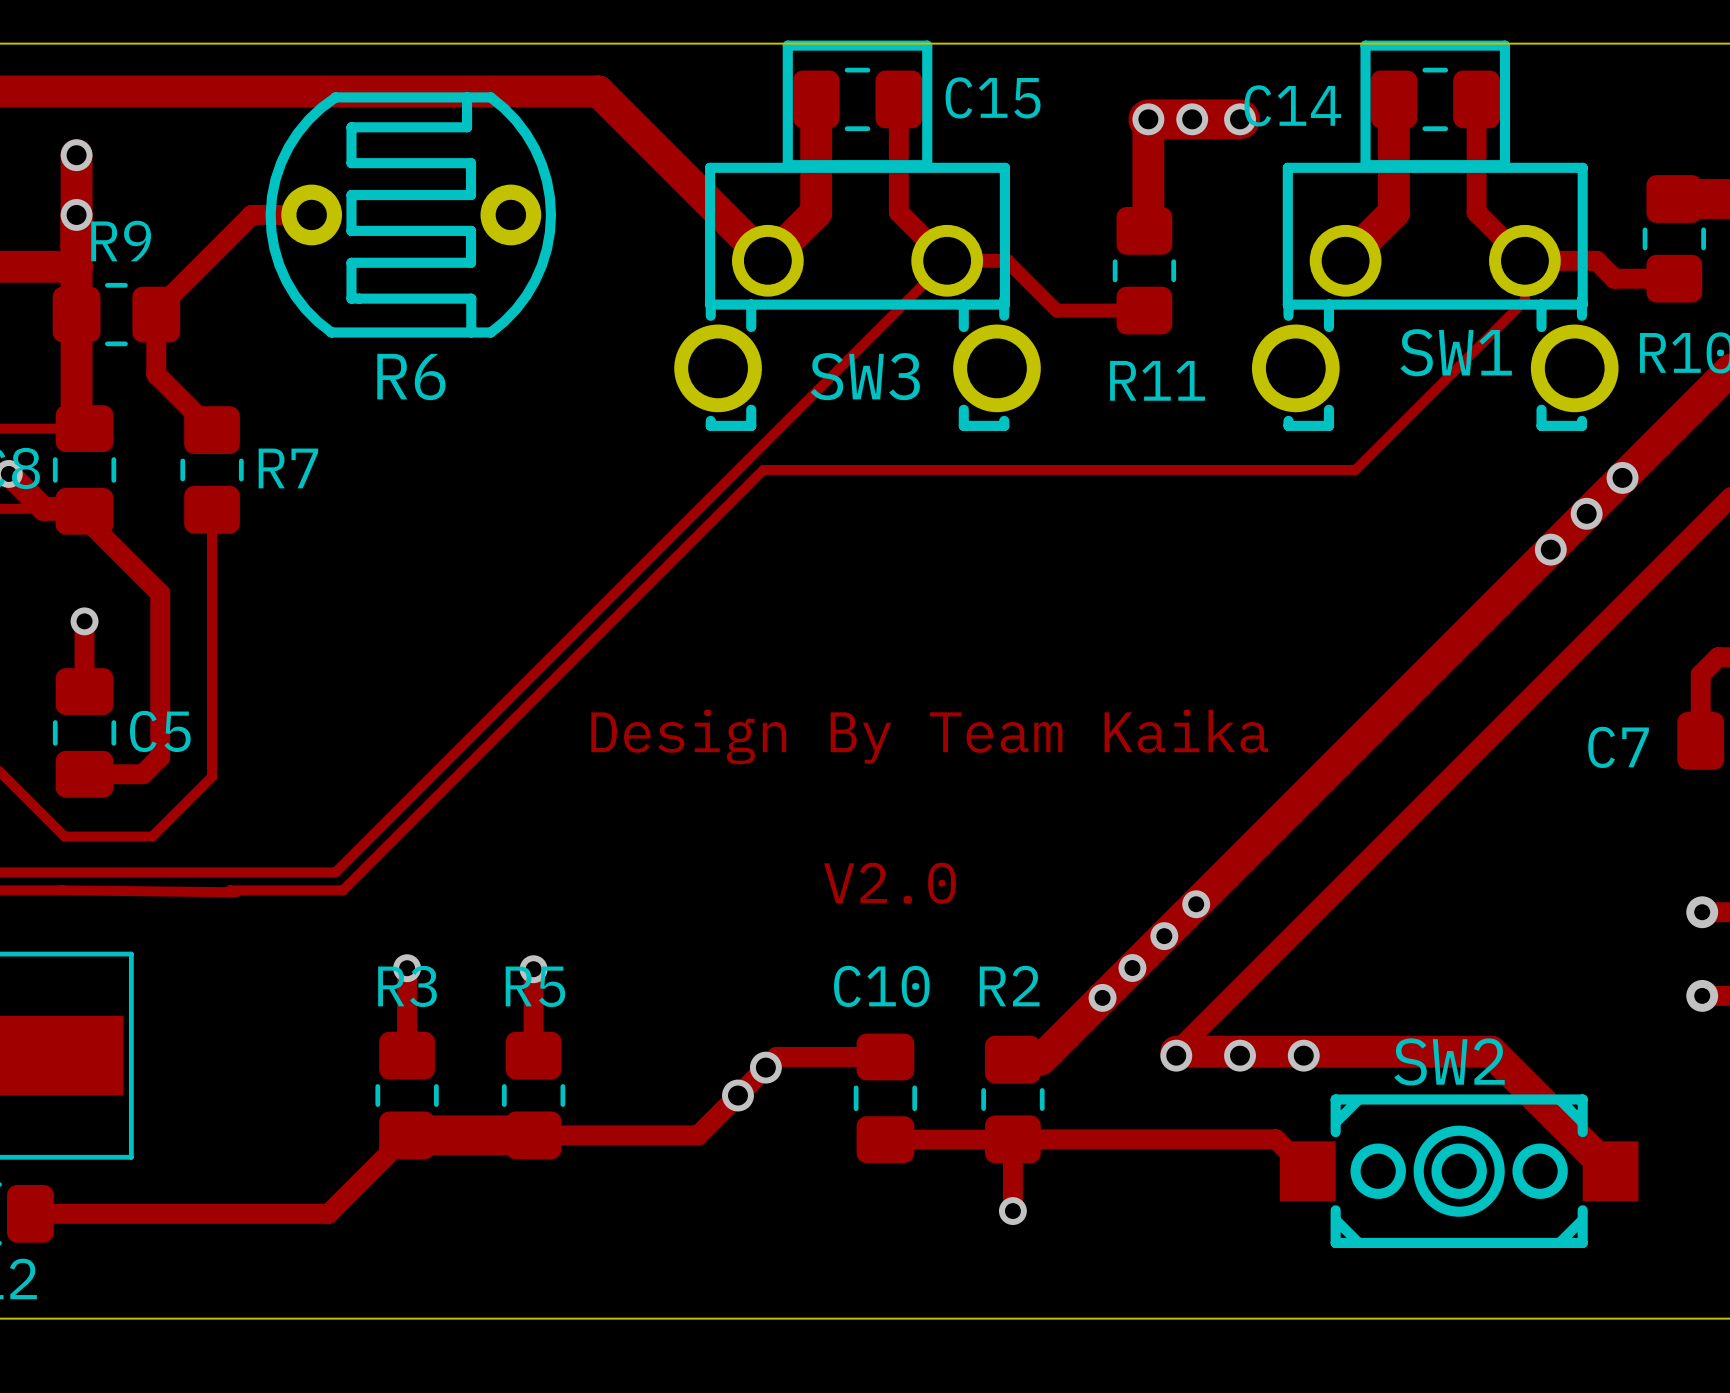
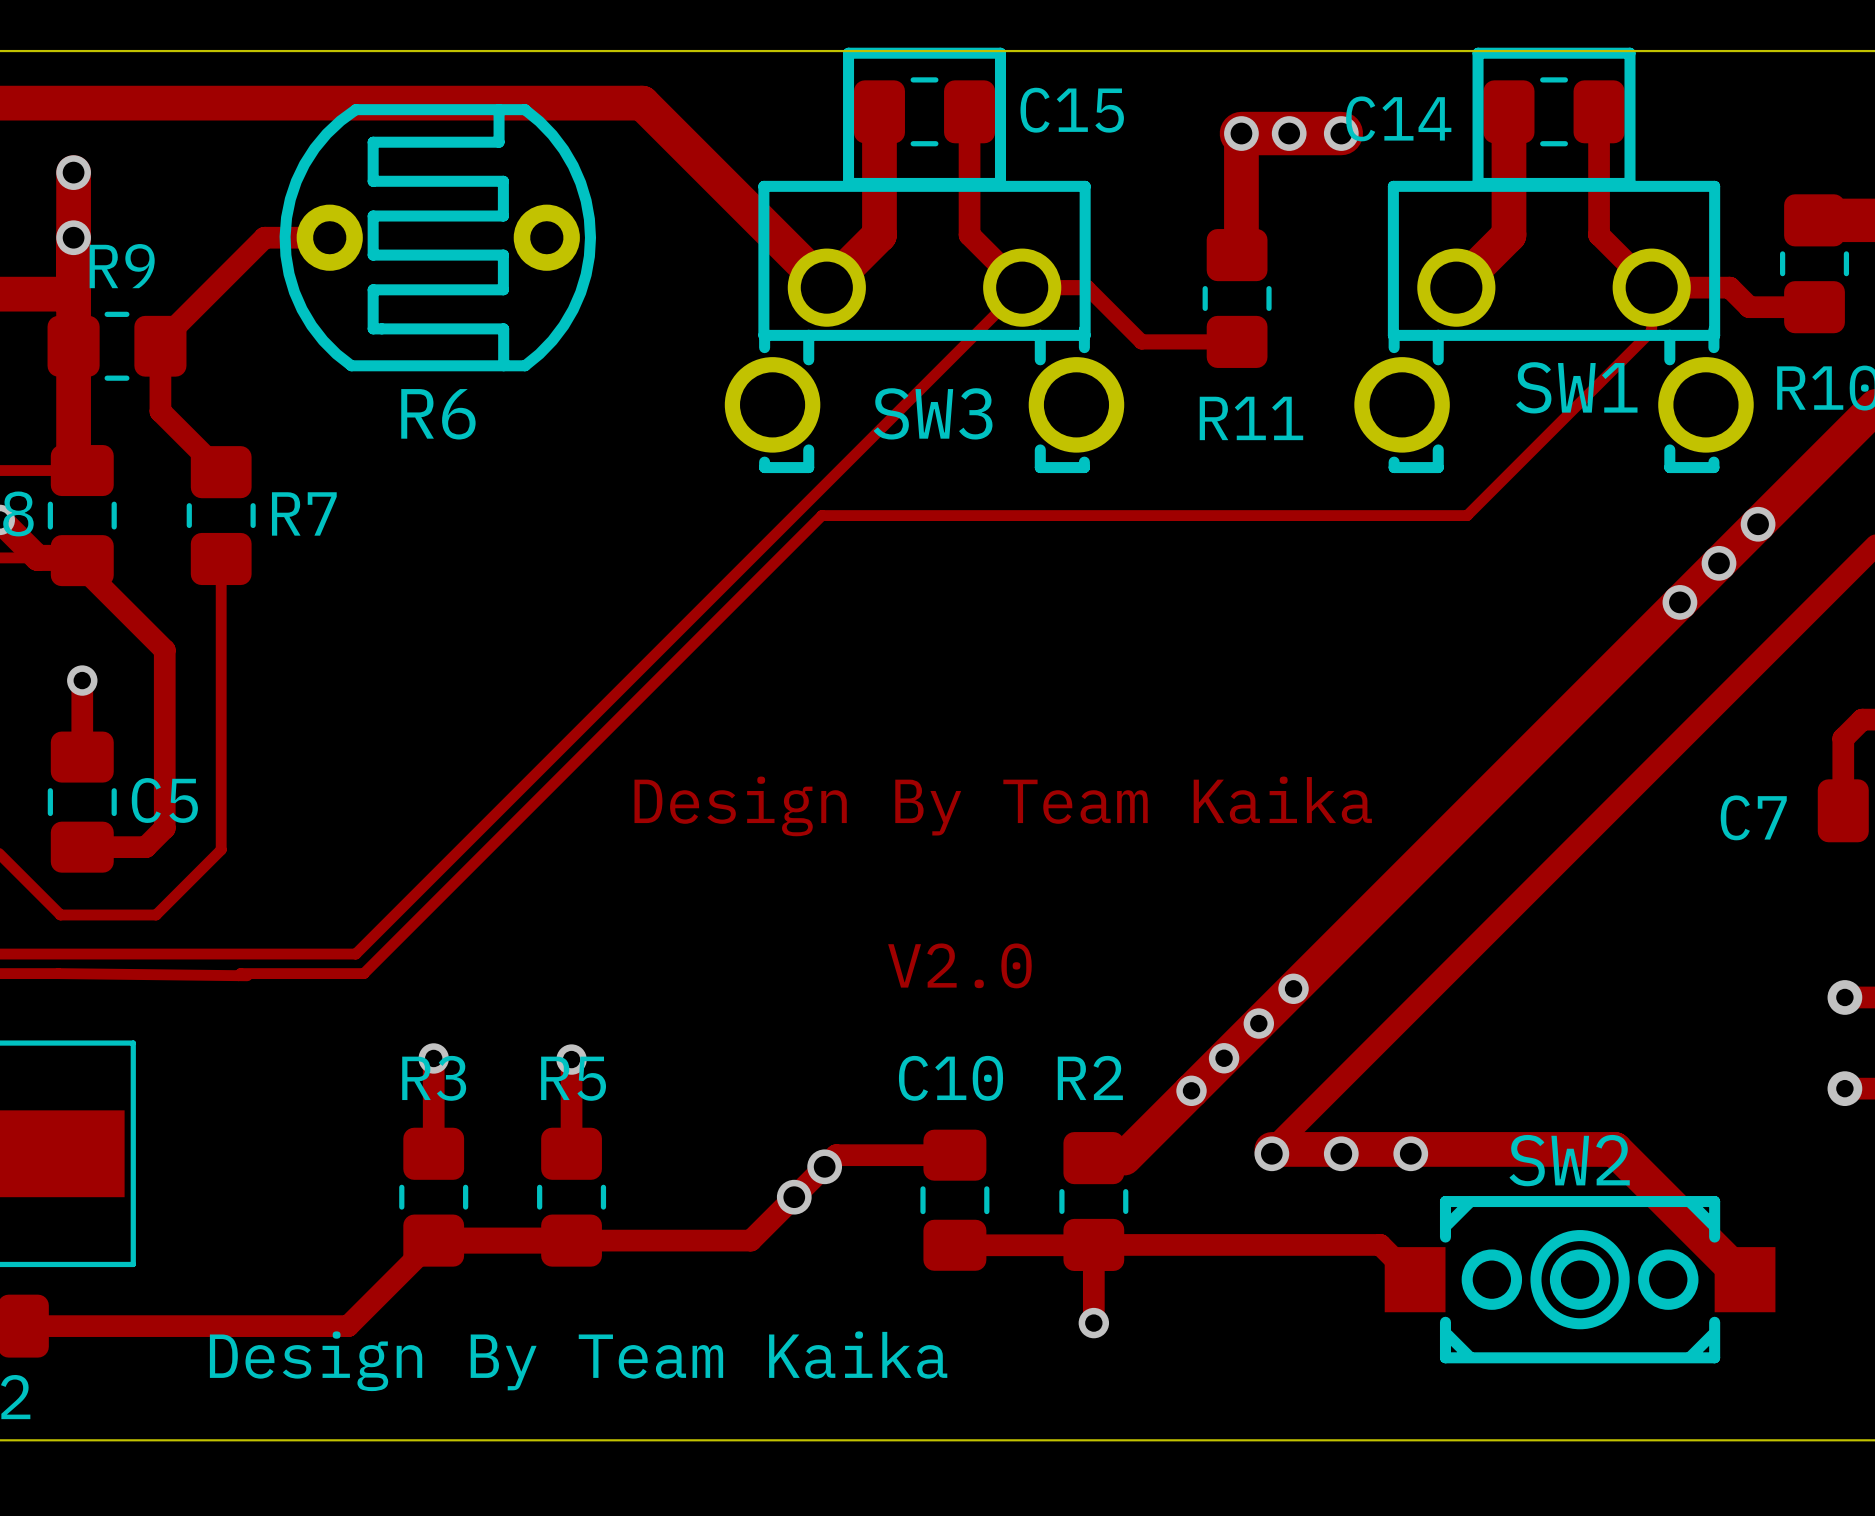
track width: thick (407, 1135) (533, 1135) -> thin (433, 1240) (571, 1240)
text: none -> Design By Team Kaika (578, 1361)

